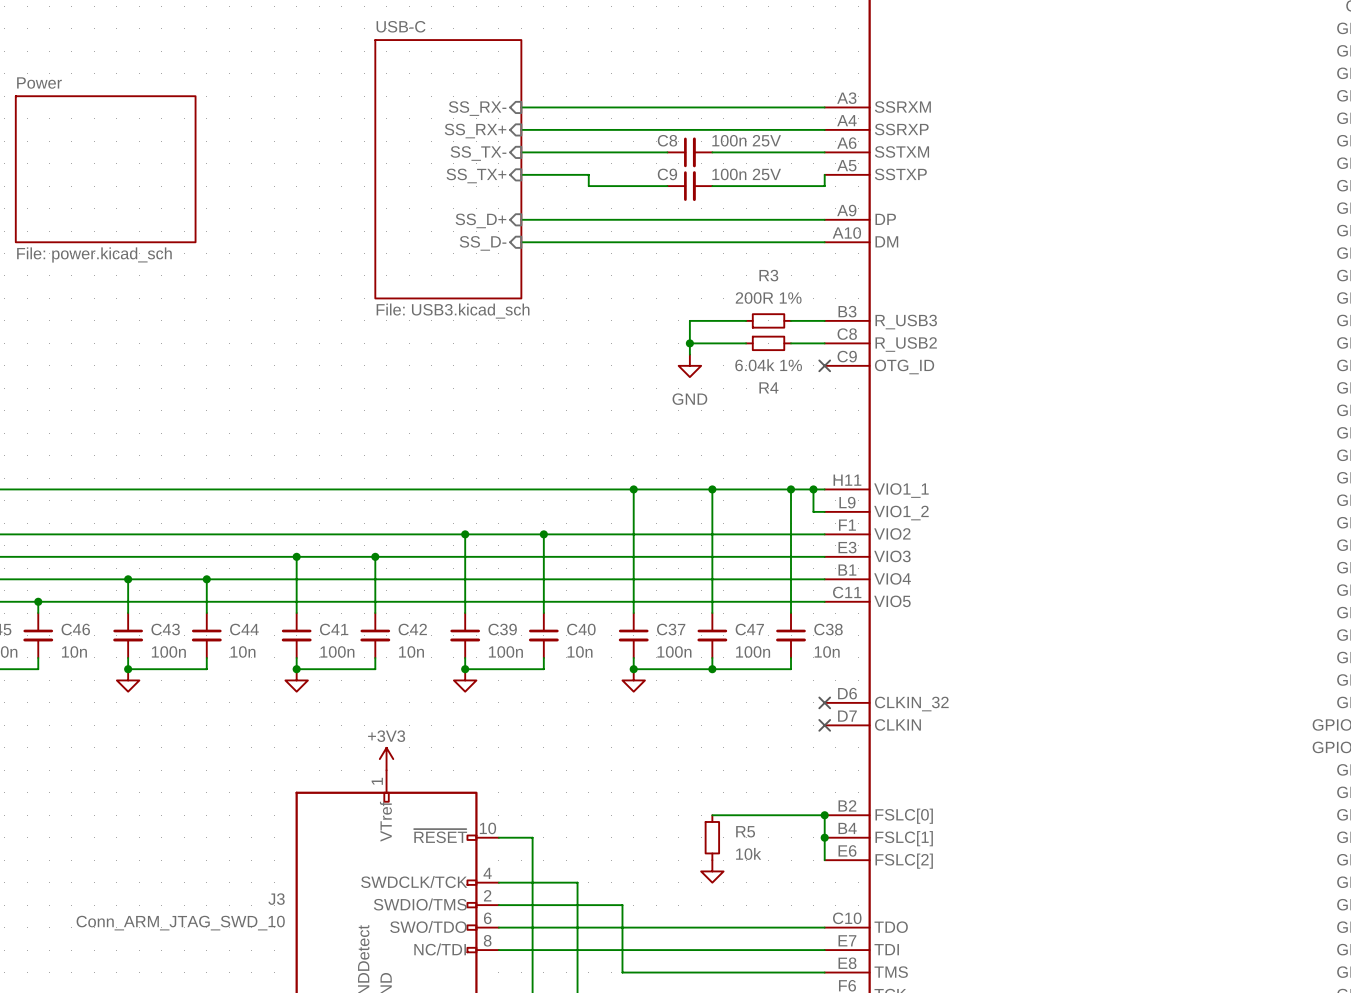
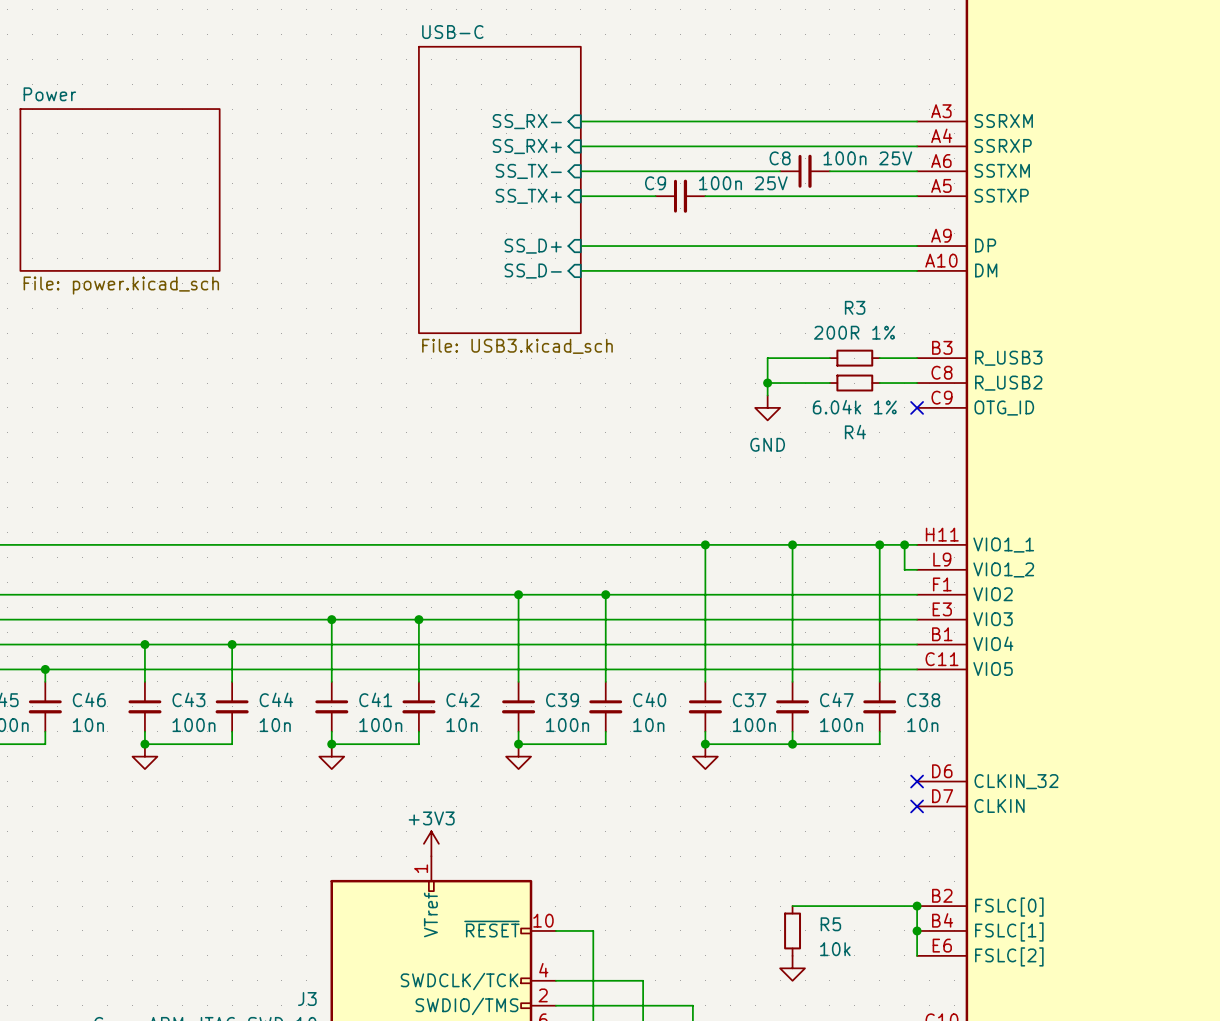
C8 position: (689, 152) -> (805, 171)
wire: (588, 174) (588, 186) (667, 186) -> none
wire: (824, 174) (824, 186) (712, 186) -> (917, 196) (705, 196)
C9 position: (689, 186) -> (680, 196)

